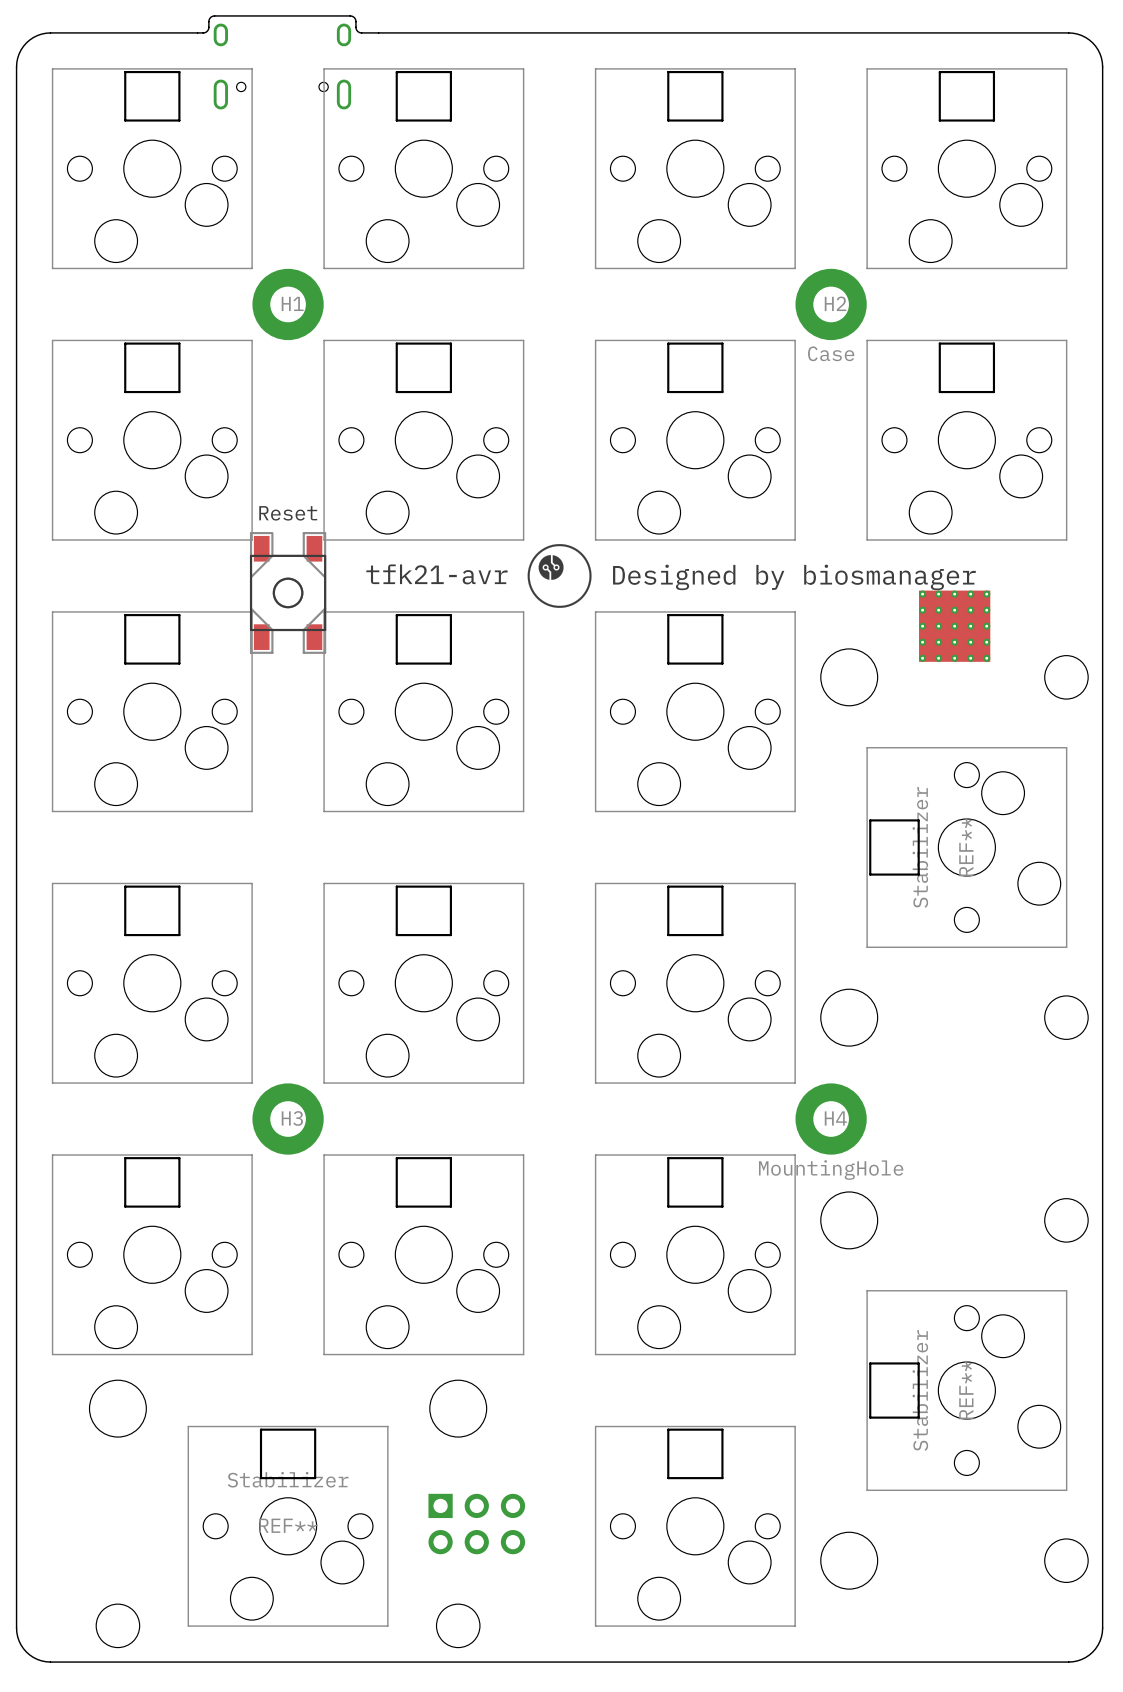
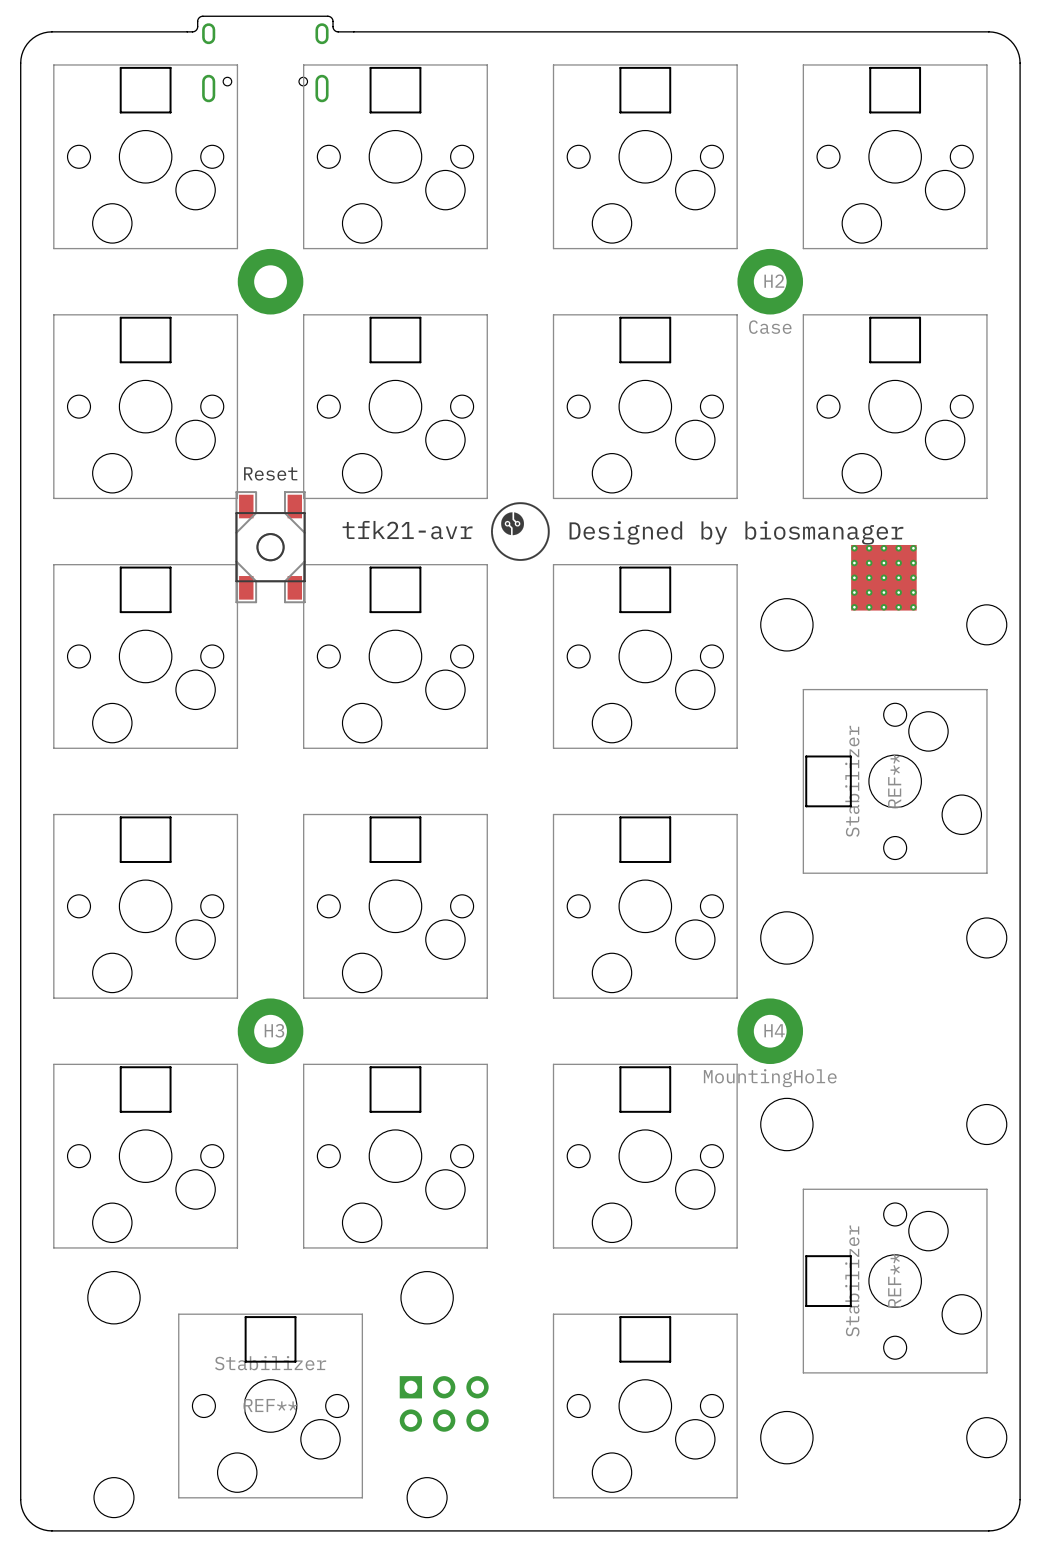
H1 name: H1 (292, 303) -> none

